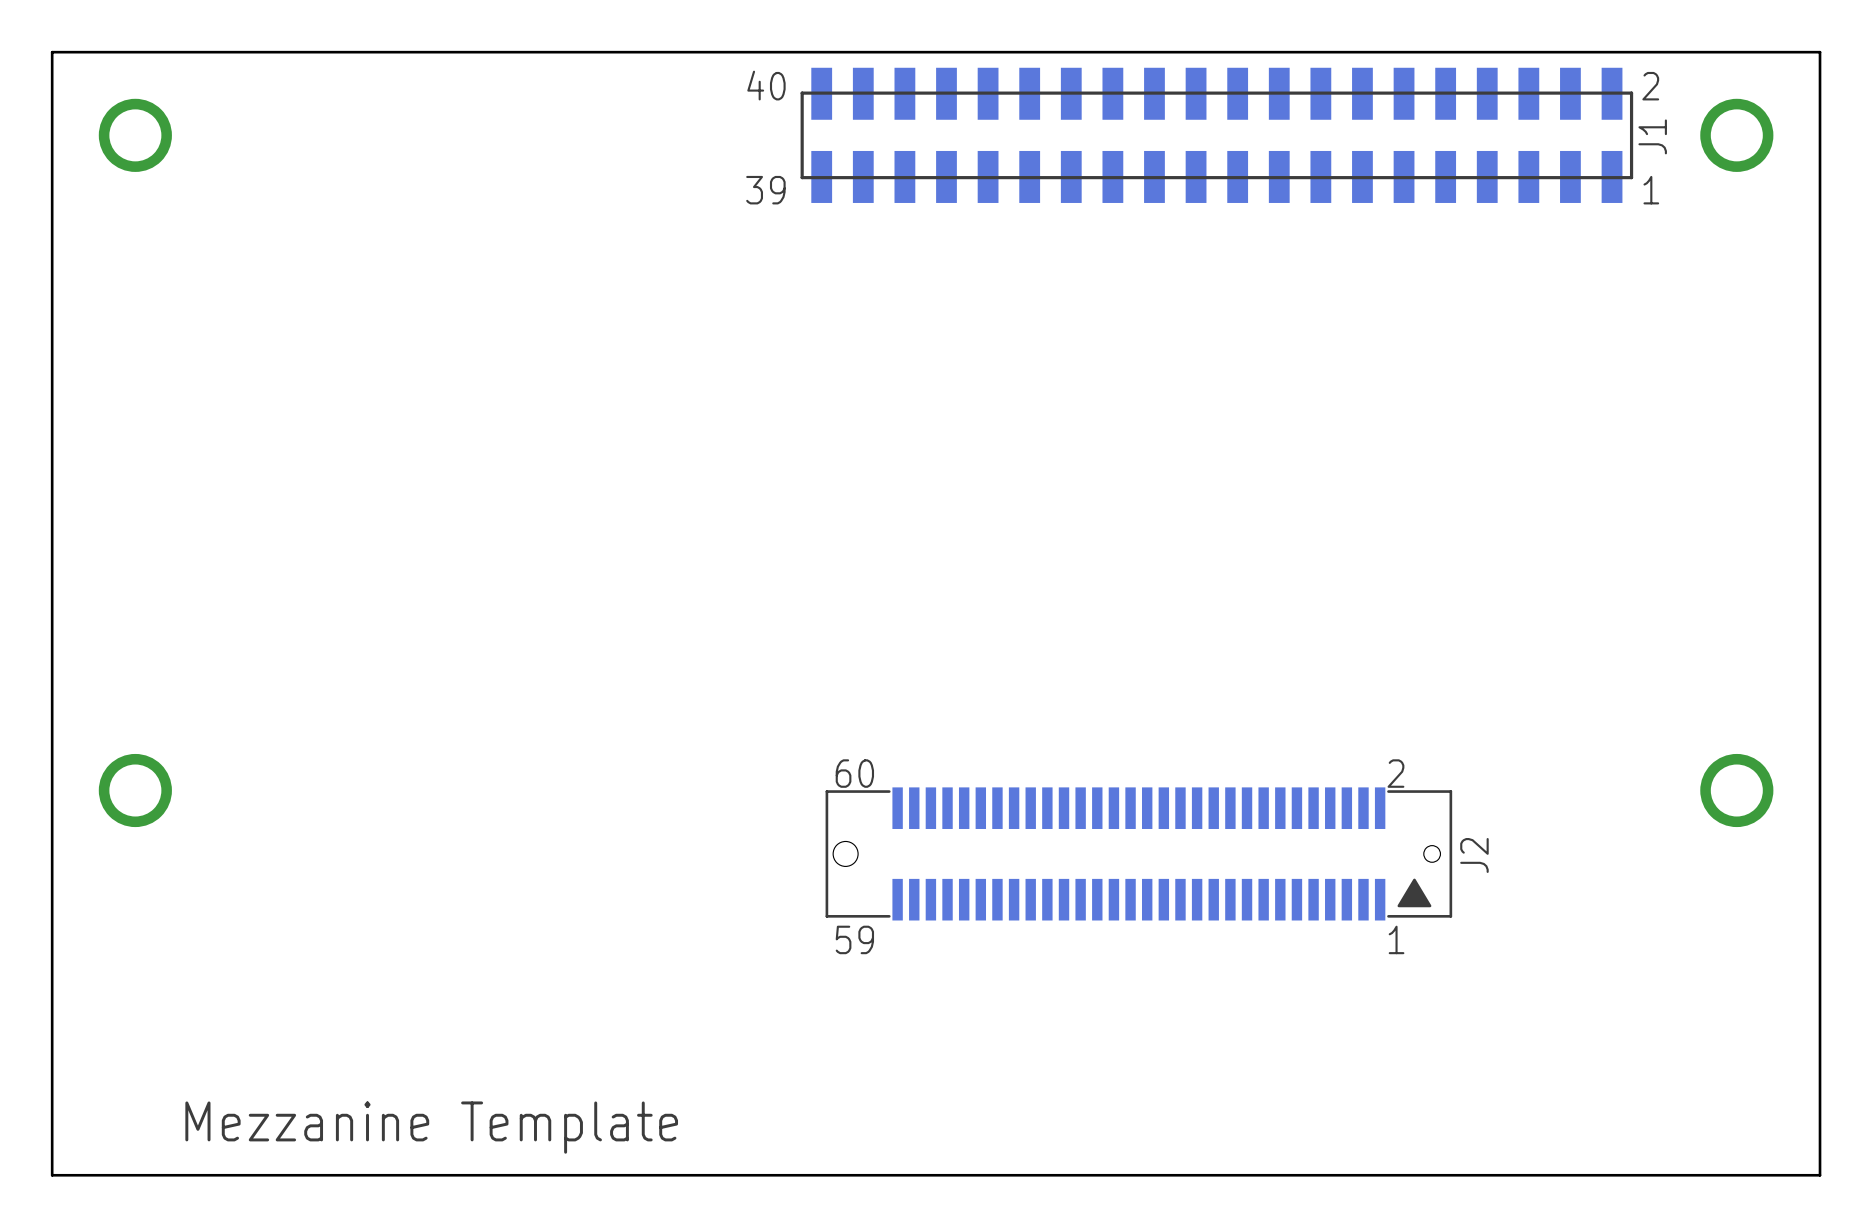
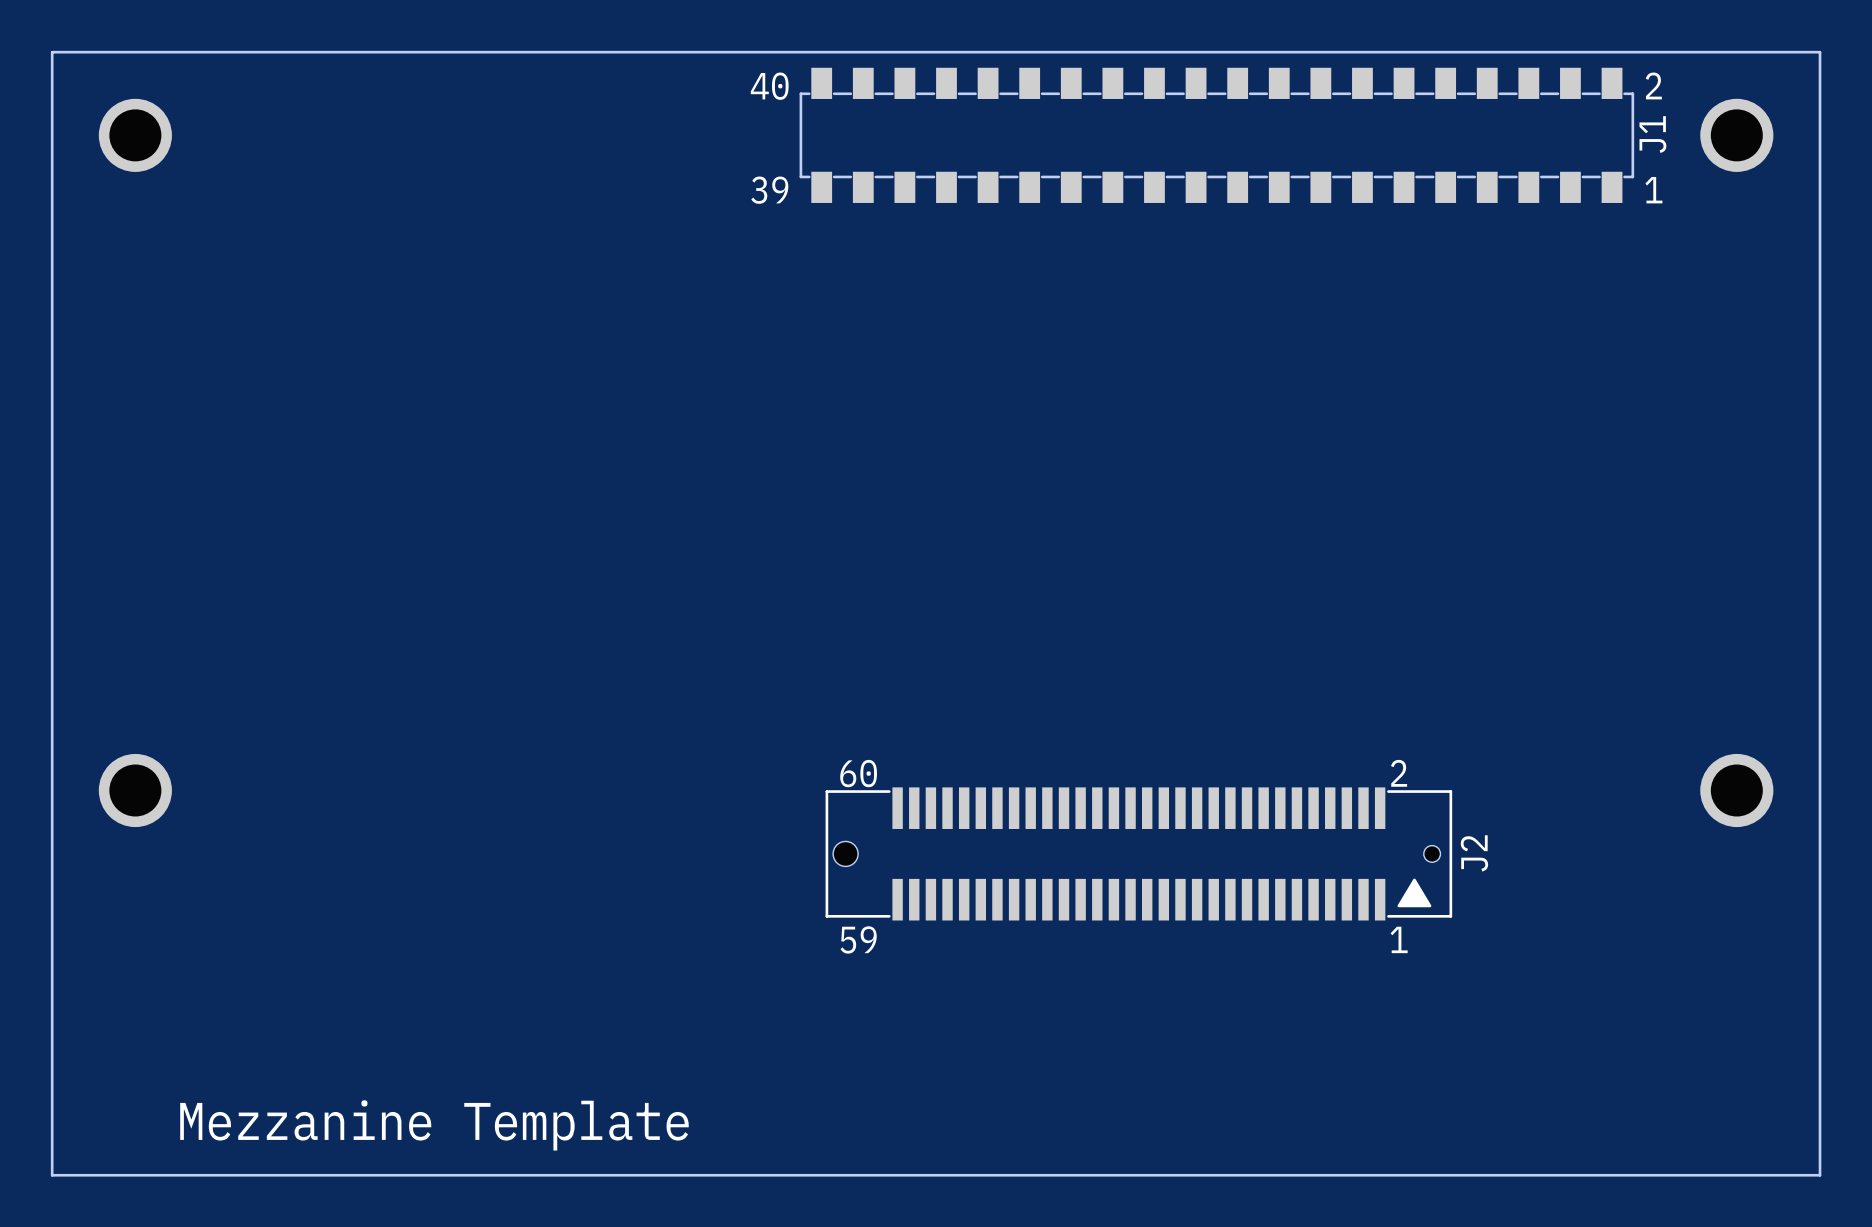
J1 footprint: [800, 67, 1634, 203] -> [799, 67, 1635, 203]

